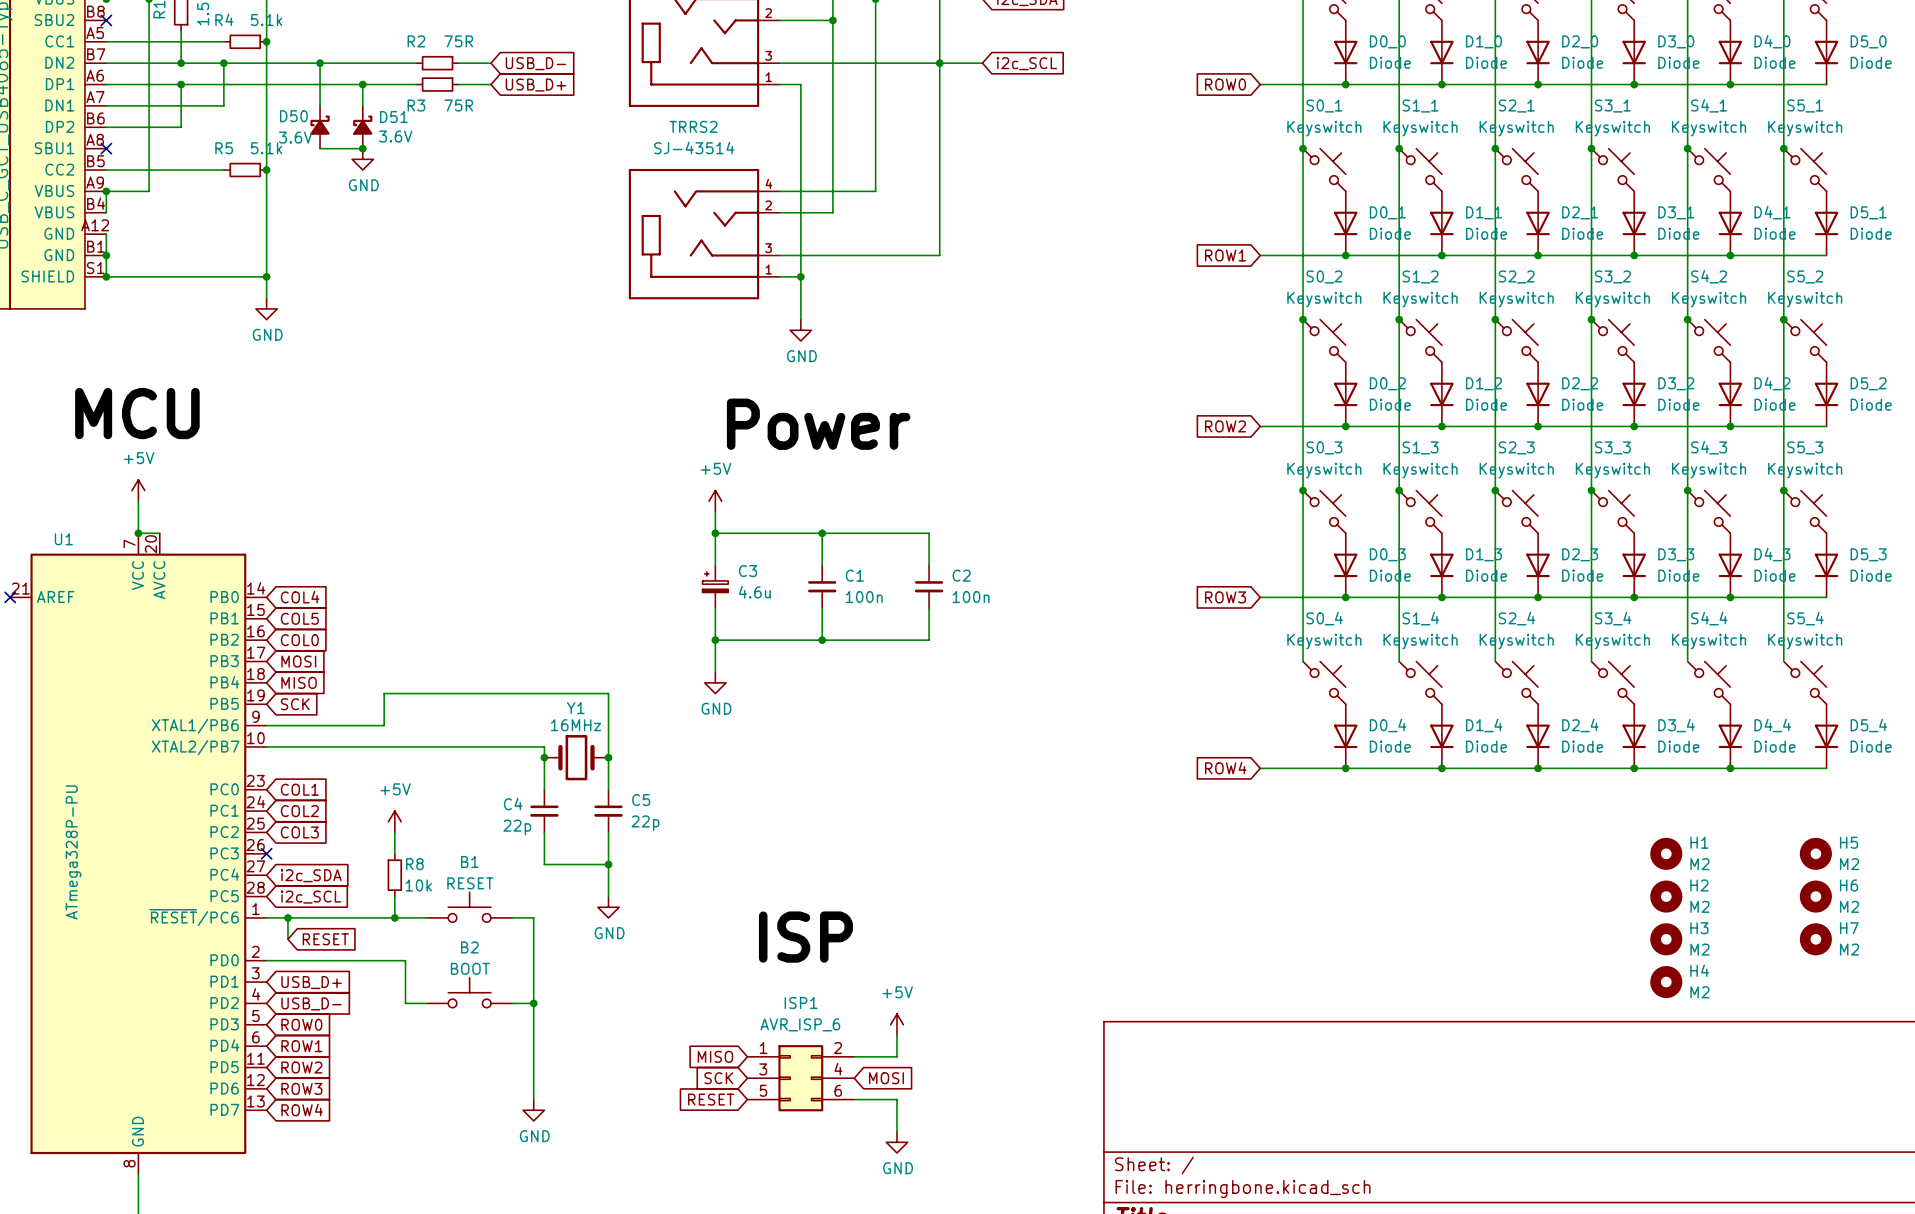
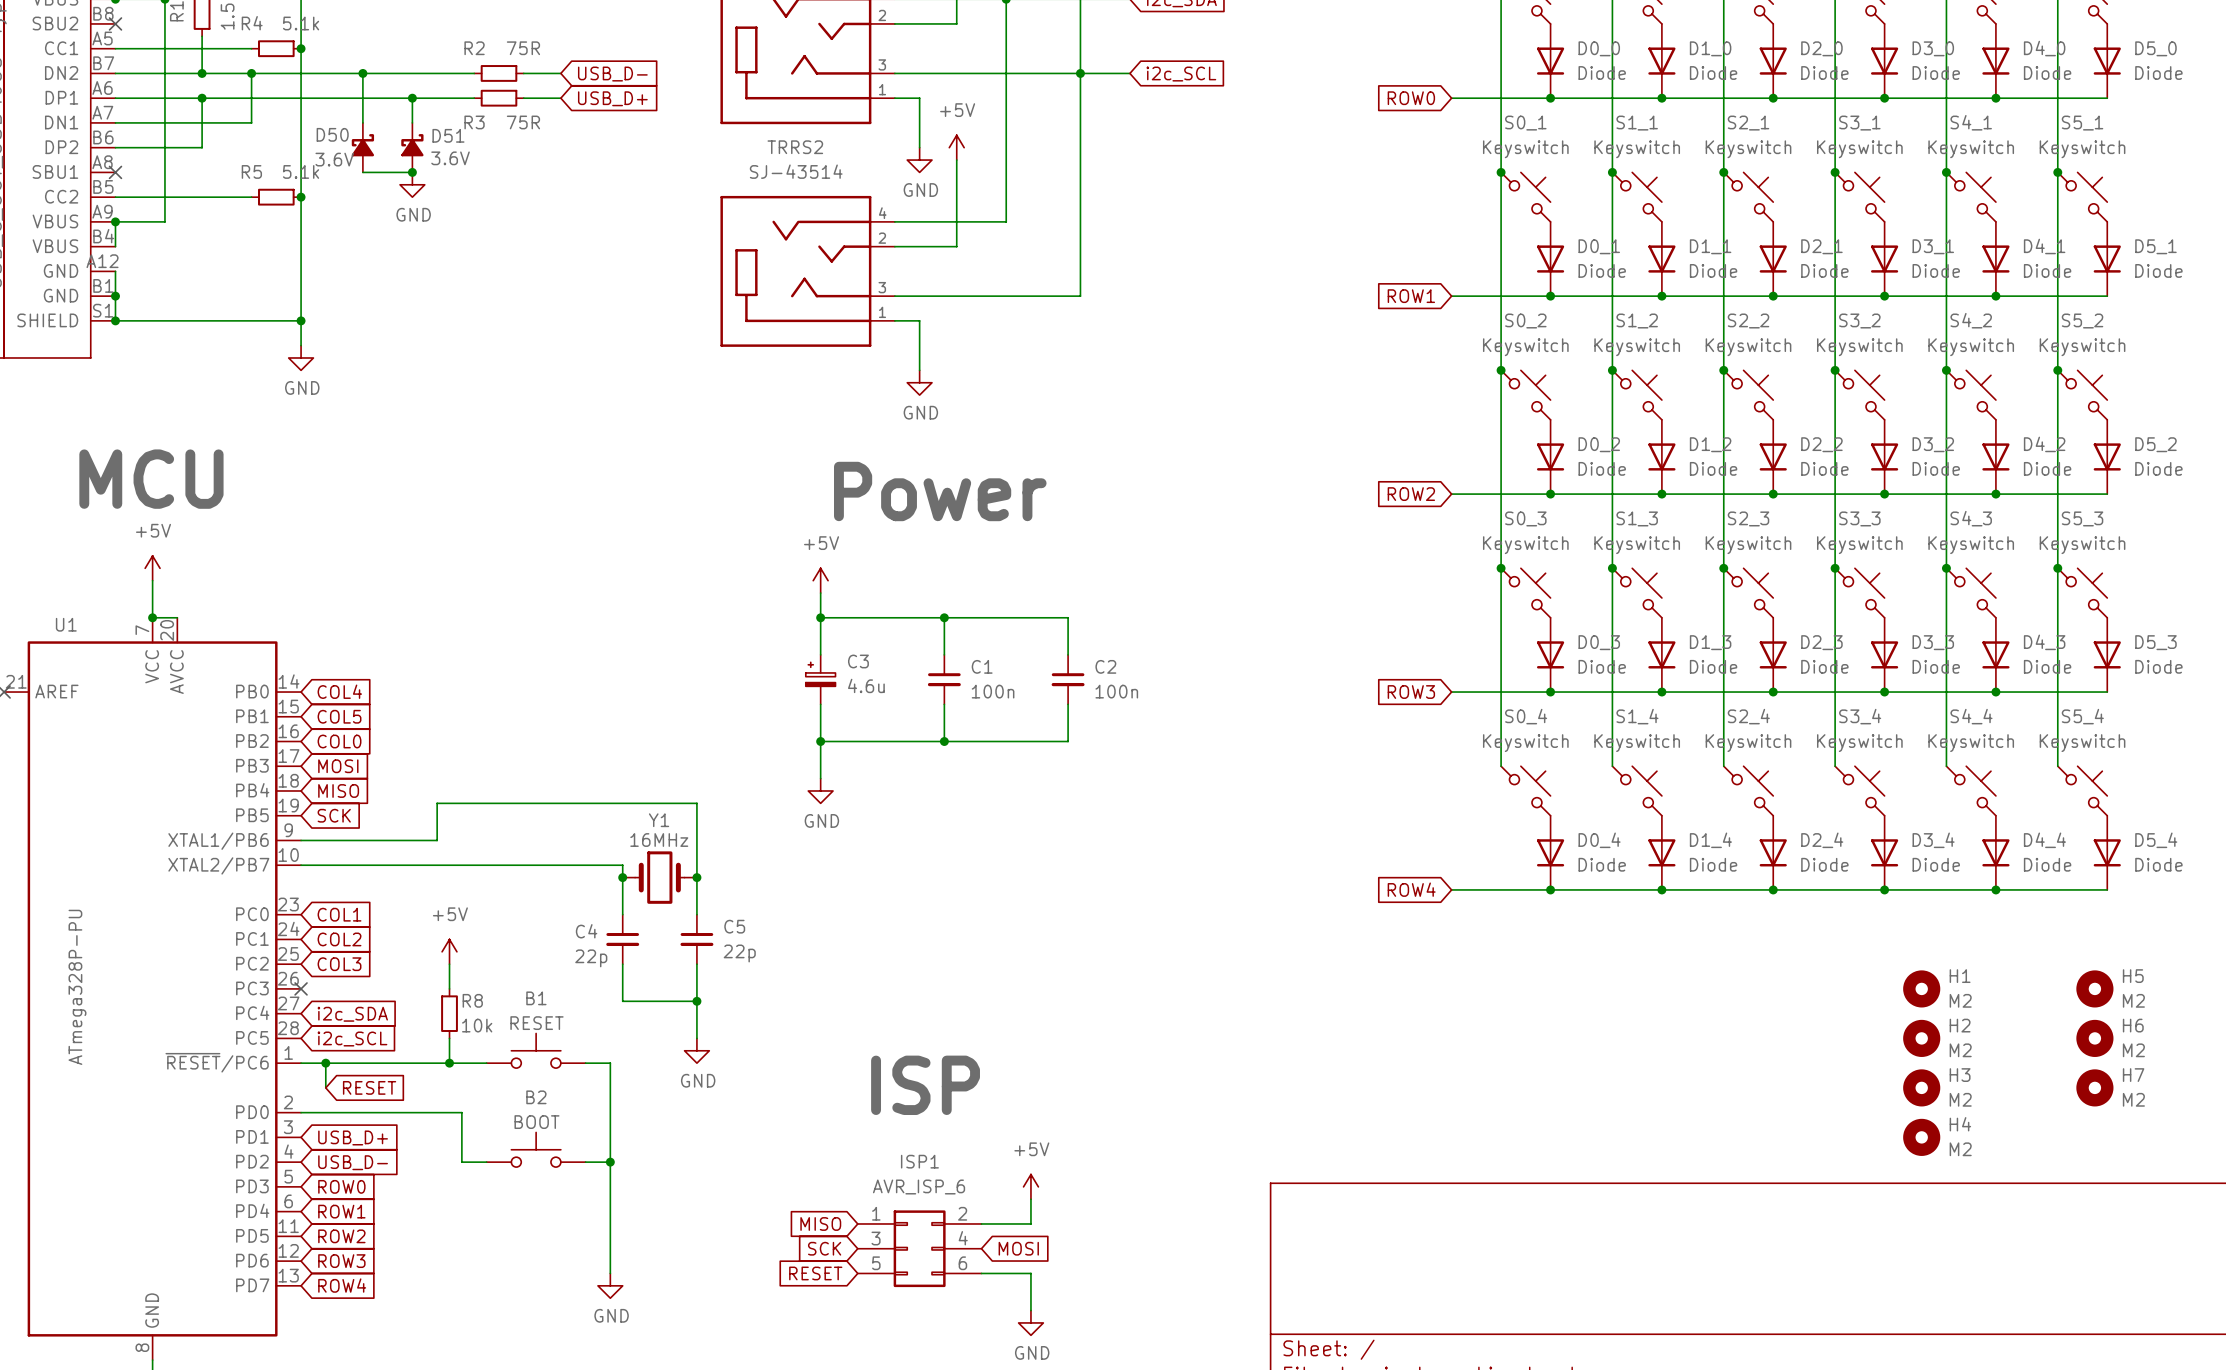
wire: (832, 20) (832, 137) -> none
junction: (832, 20) -> none
wire: (800, 127) (800, 276) -> none
power symbol: none -> +5V (956, 147)
power symbol: none -> GND (919, 160)
junction: (800, 276) -> none

